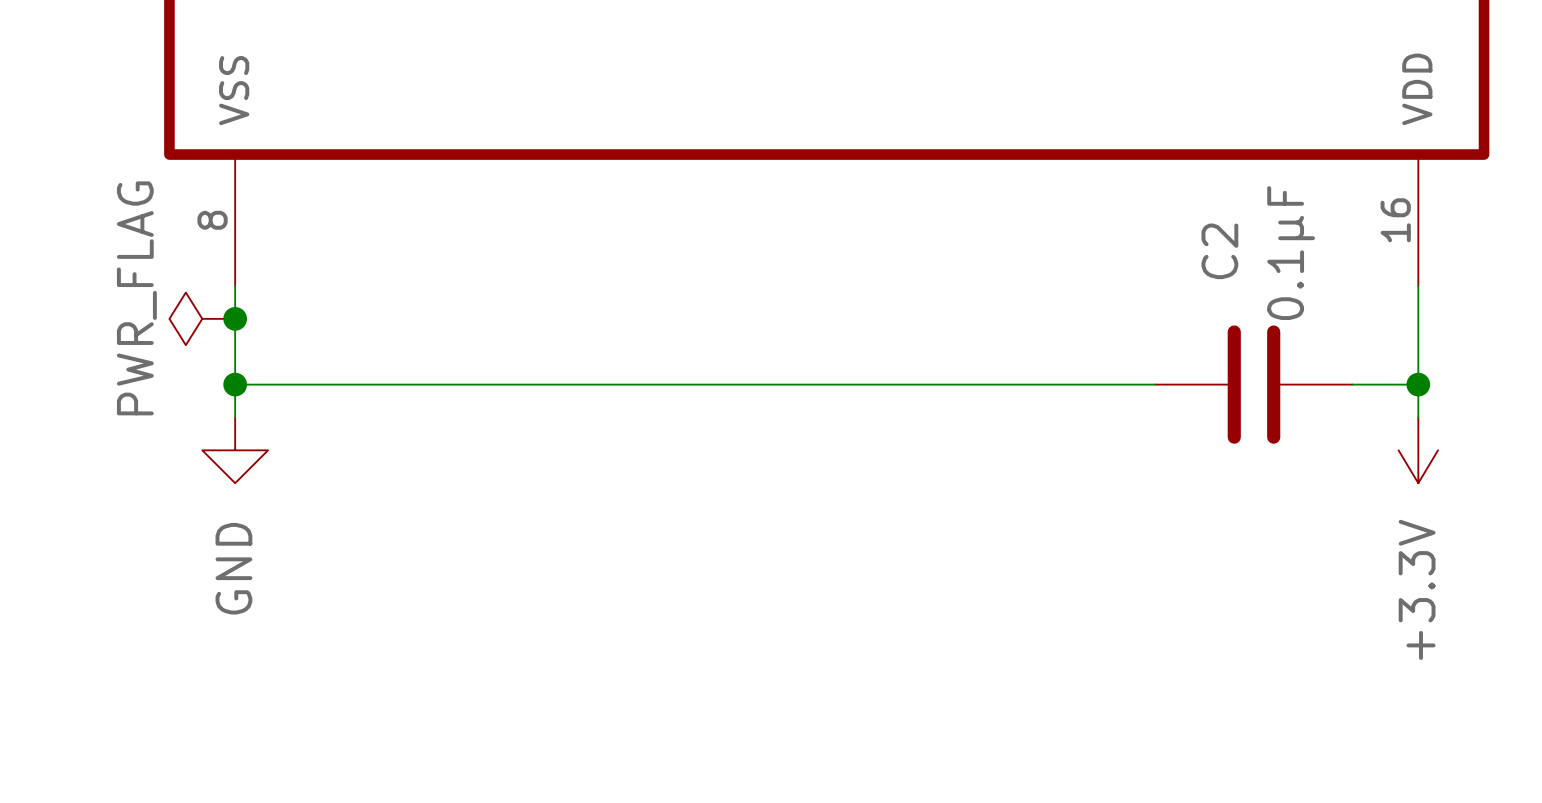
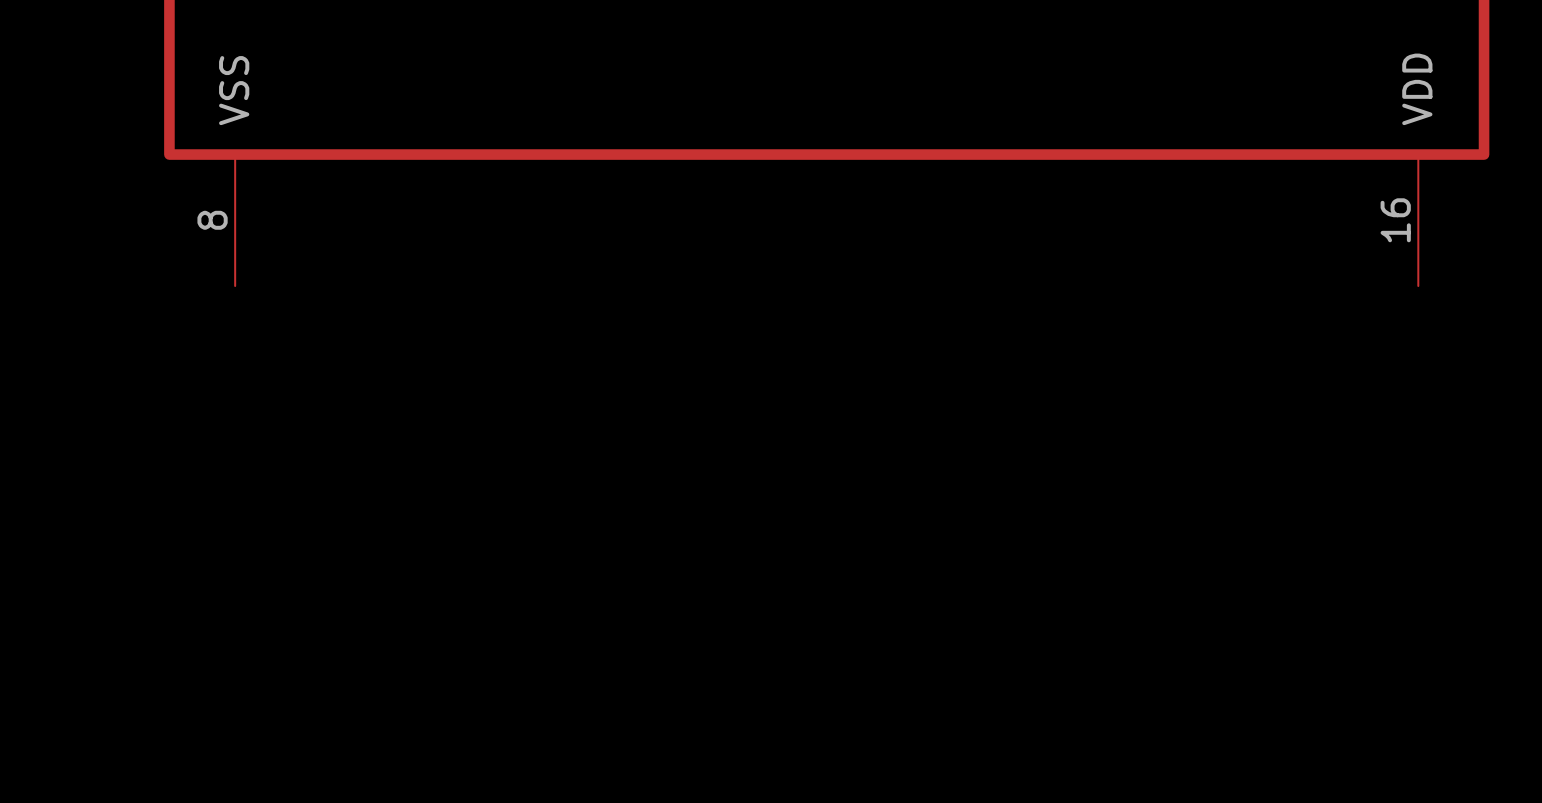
wire: (235, 286) (235, 417) -> none
wire: (1418, 286) (1418, 417) -> none
power symbol: PWR_FLAG (202, 318) -> none
junction: (235, 318) -> none
wire: (235, 384) (1155, 384) -> none
junction: (235, 384) -> none
C2: 0.1µF (1253, 384) -> none
wire: (1352, 384) (1418, 384) -> none
junction: (1418, 384) -> none
power symbol: GND (235, 450) -> none
power symbol: +3.3V (1418, 450) -> none

